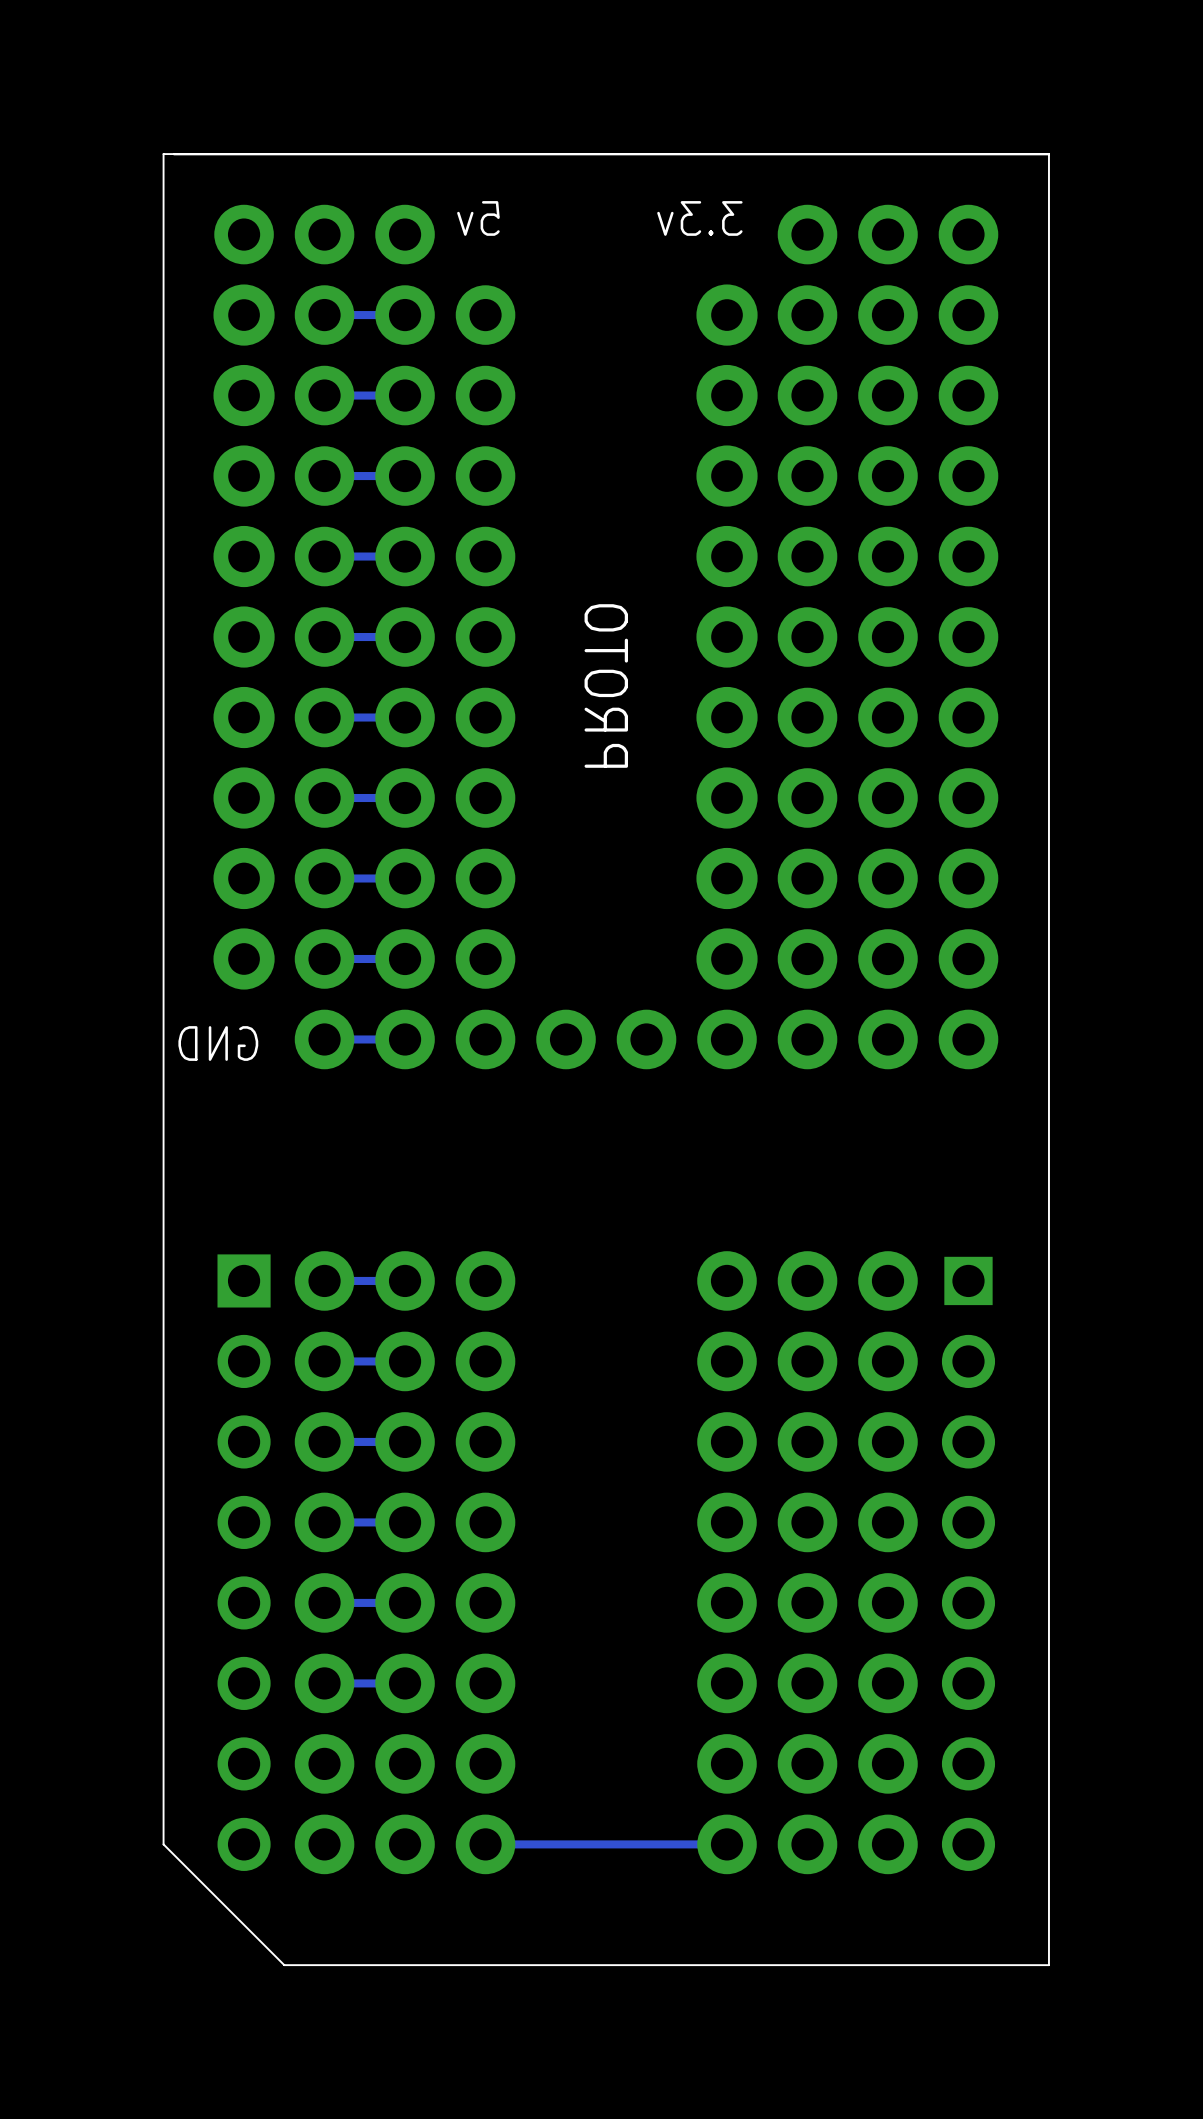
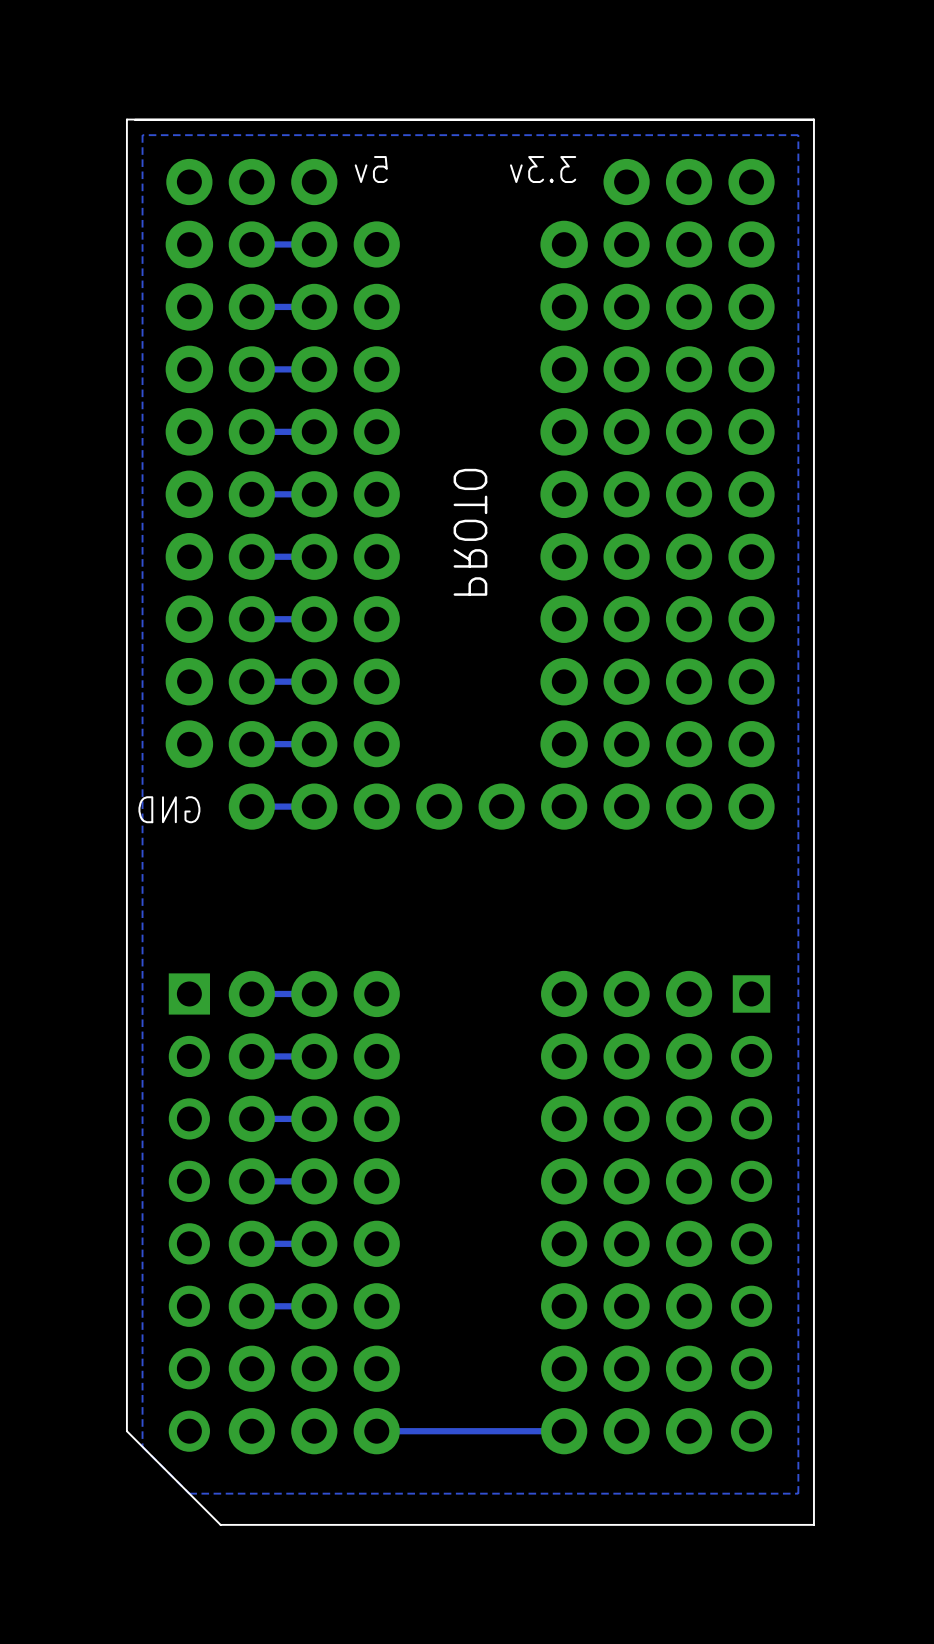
zone outline: none -> (798, 135) (142, 135) (142, 1446) (189, 1493) (798, 1493) (798, 135)

